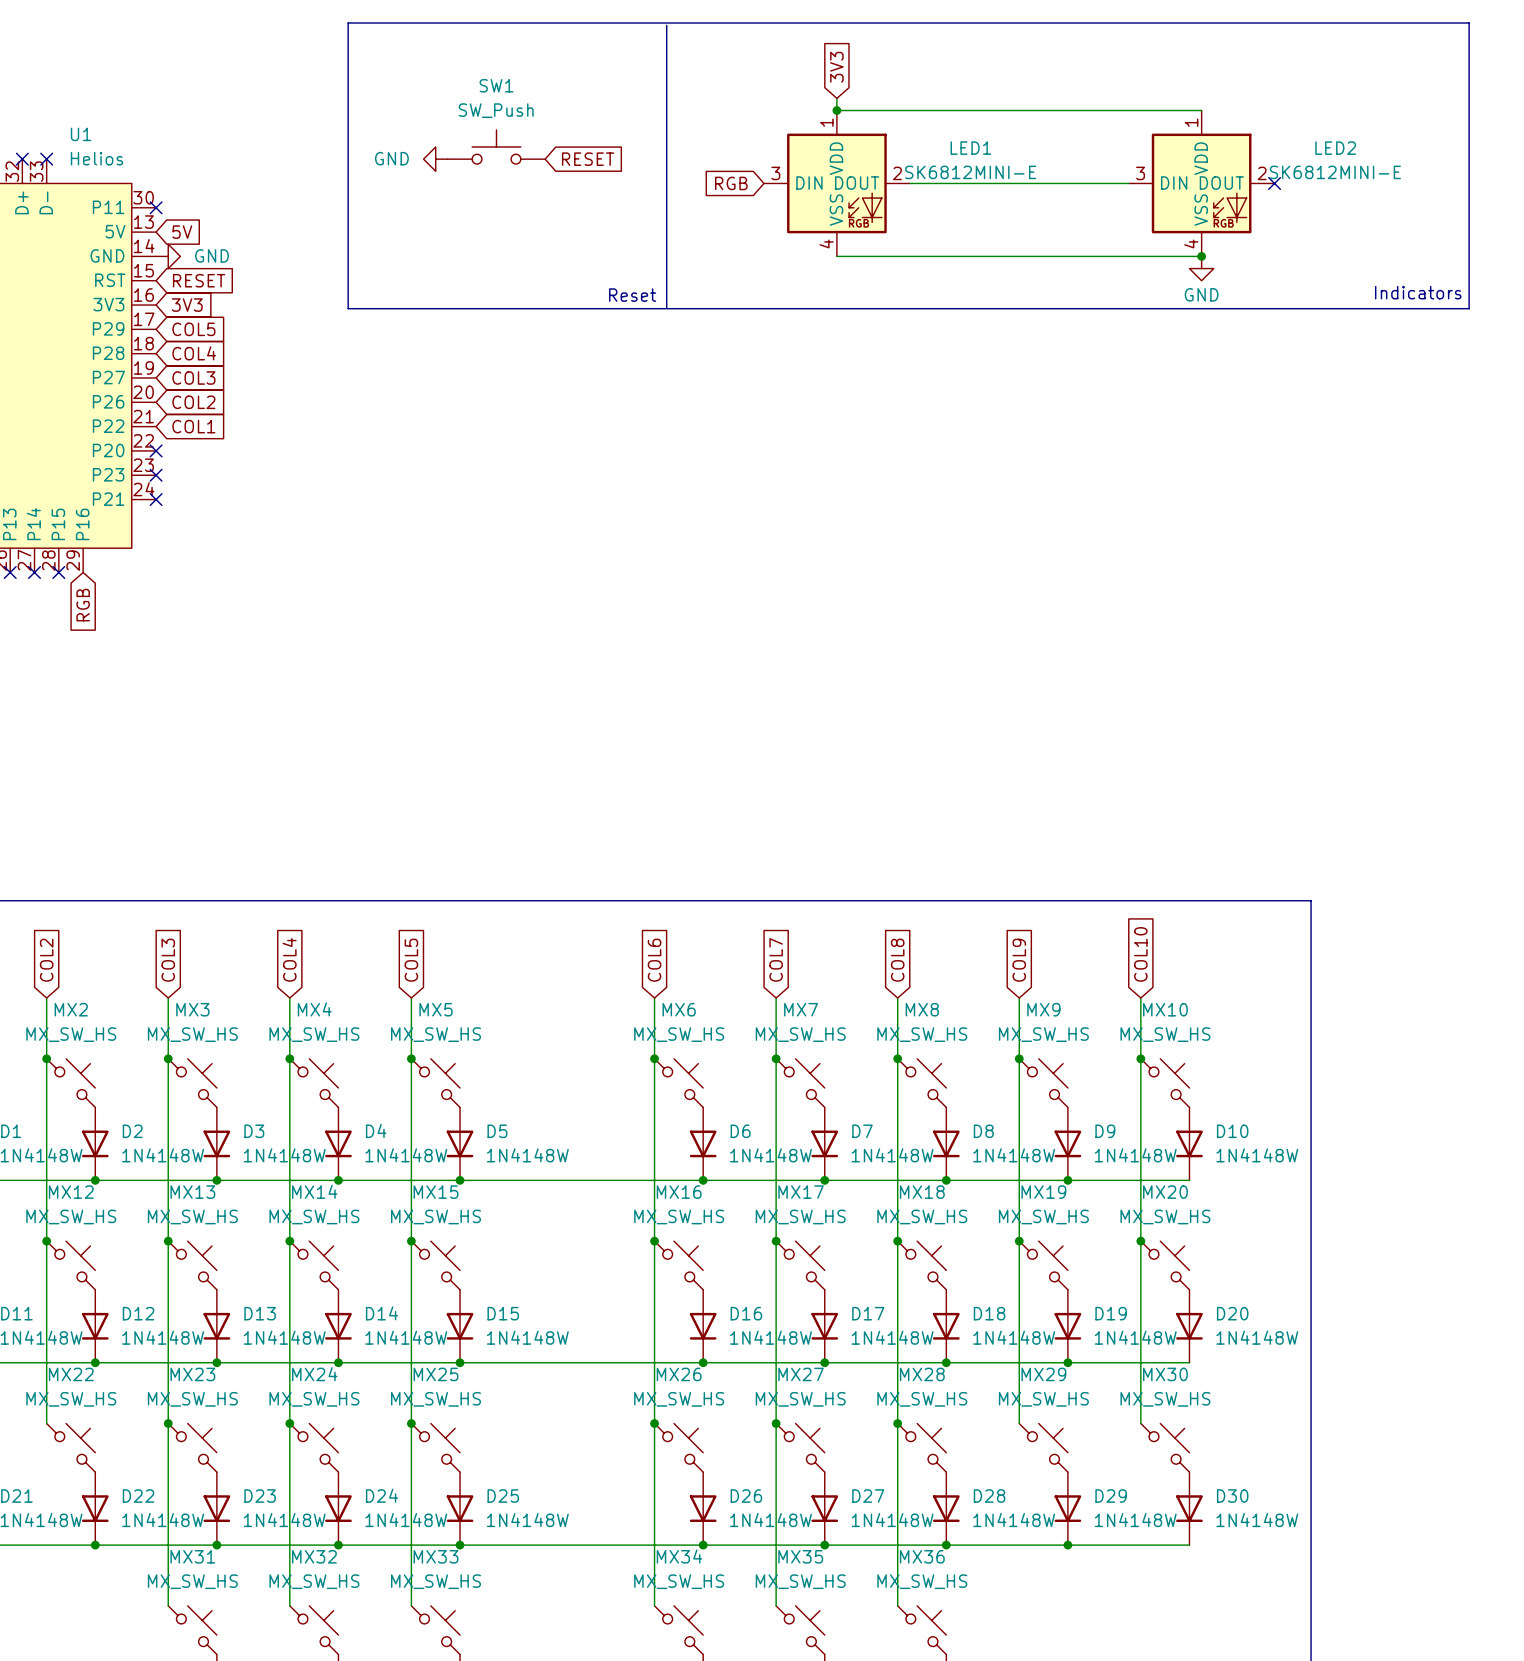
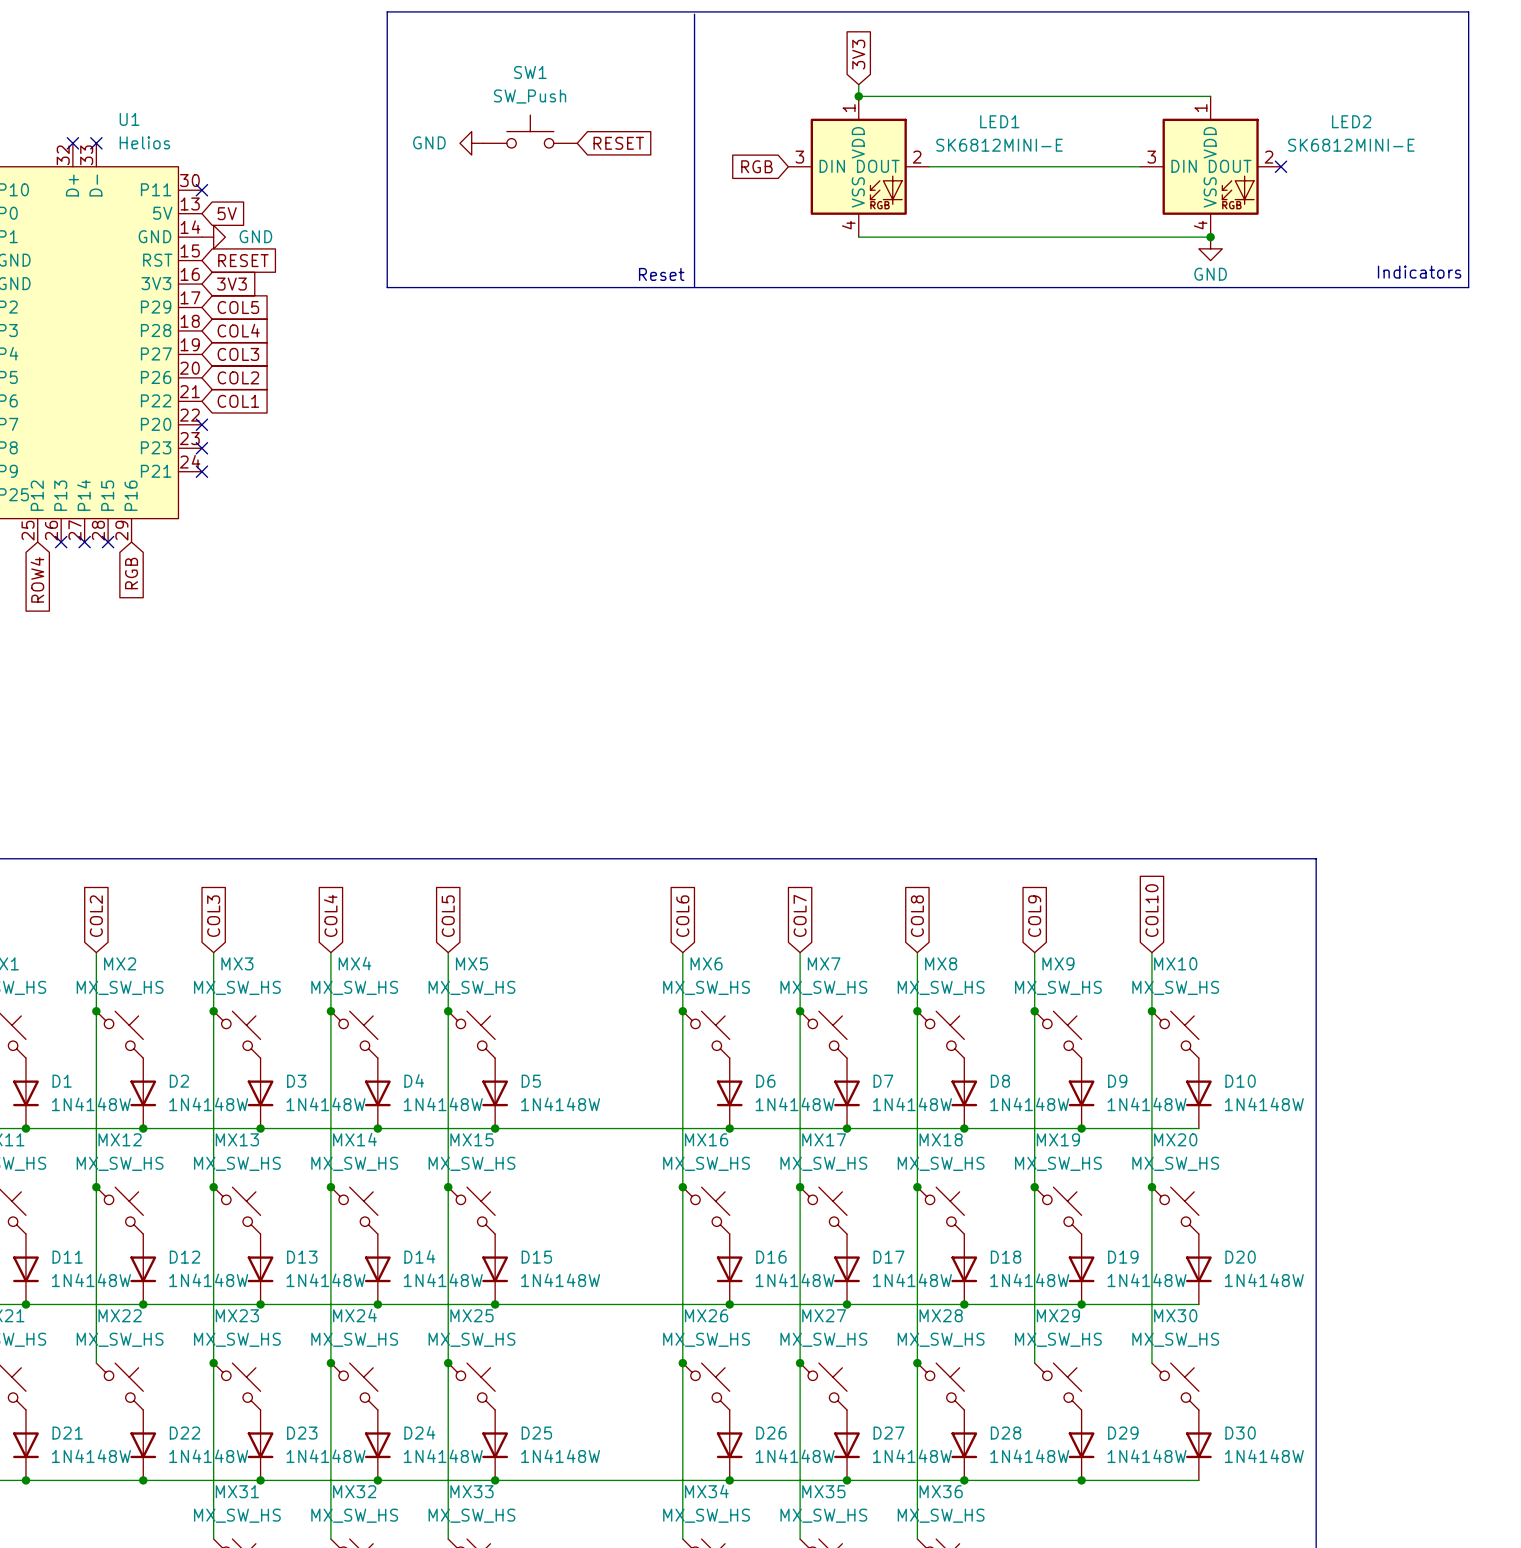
LED1 name position: LED1 (970, 148) -> LED1 (999, 121)
LED2 name position: LED2 (1335, 148) -> LED2 (1351, 121)
LED1 value position: SK6812MINI-E (970, 172) -> SK6812MINI-E (999, 145)
LED2 value position: SK6812MINI-E (1335, 172) -> SK6812MINI-E (1351, 145)

